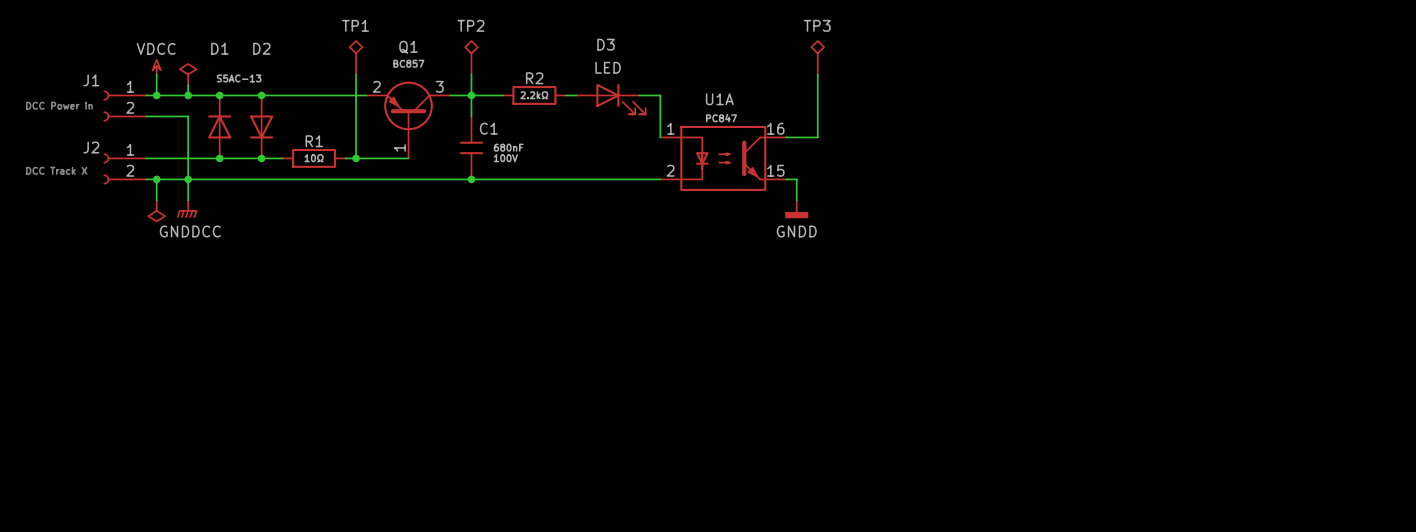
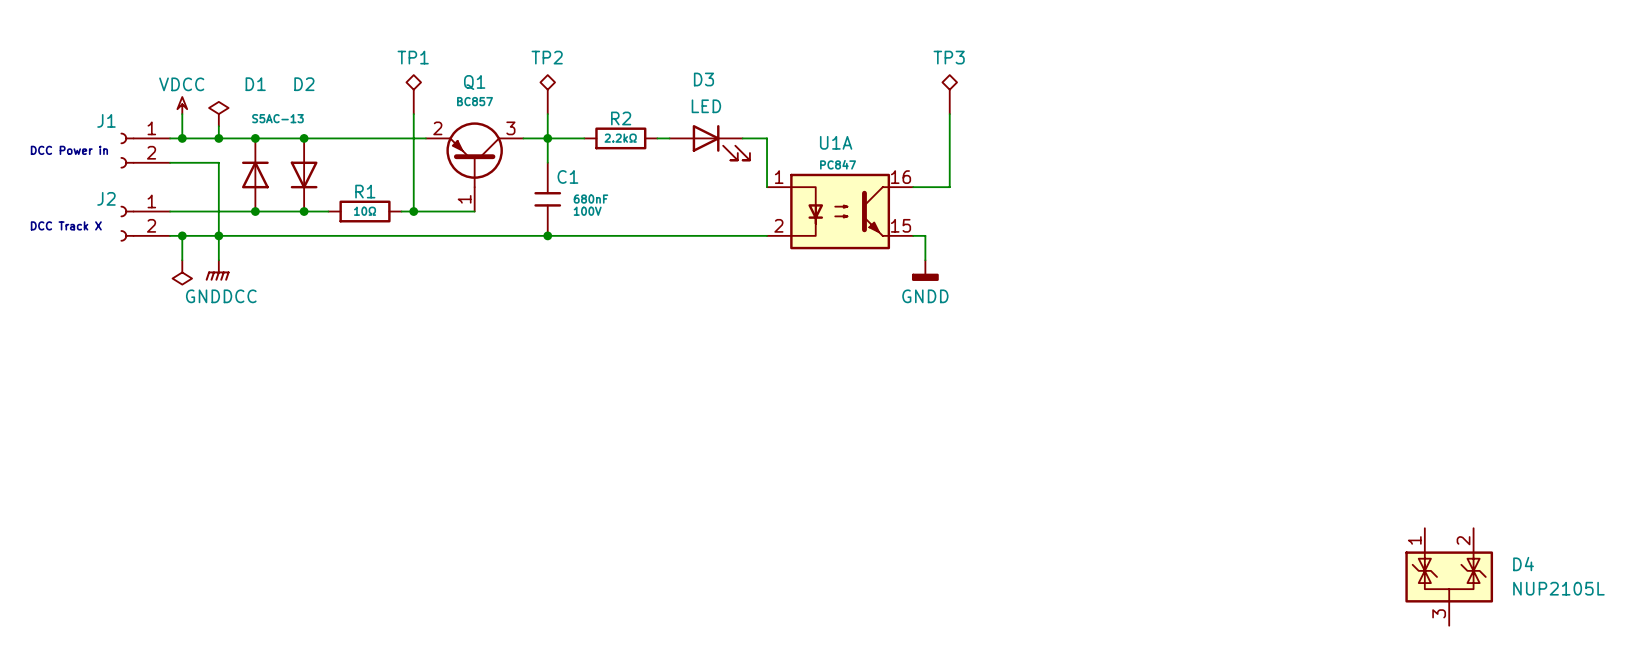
D4: none -> NUP2105L (1449, 576)

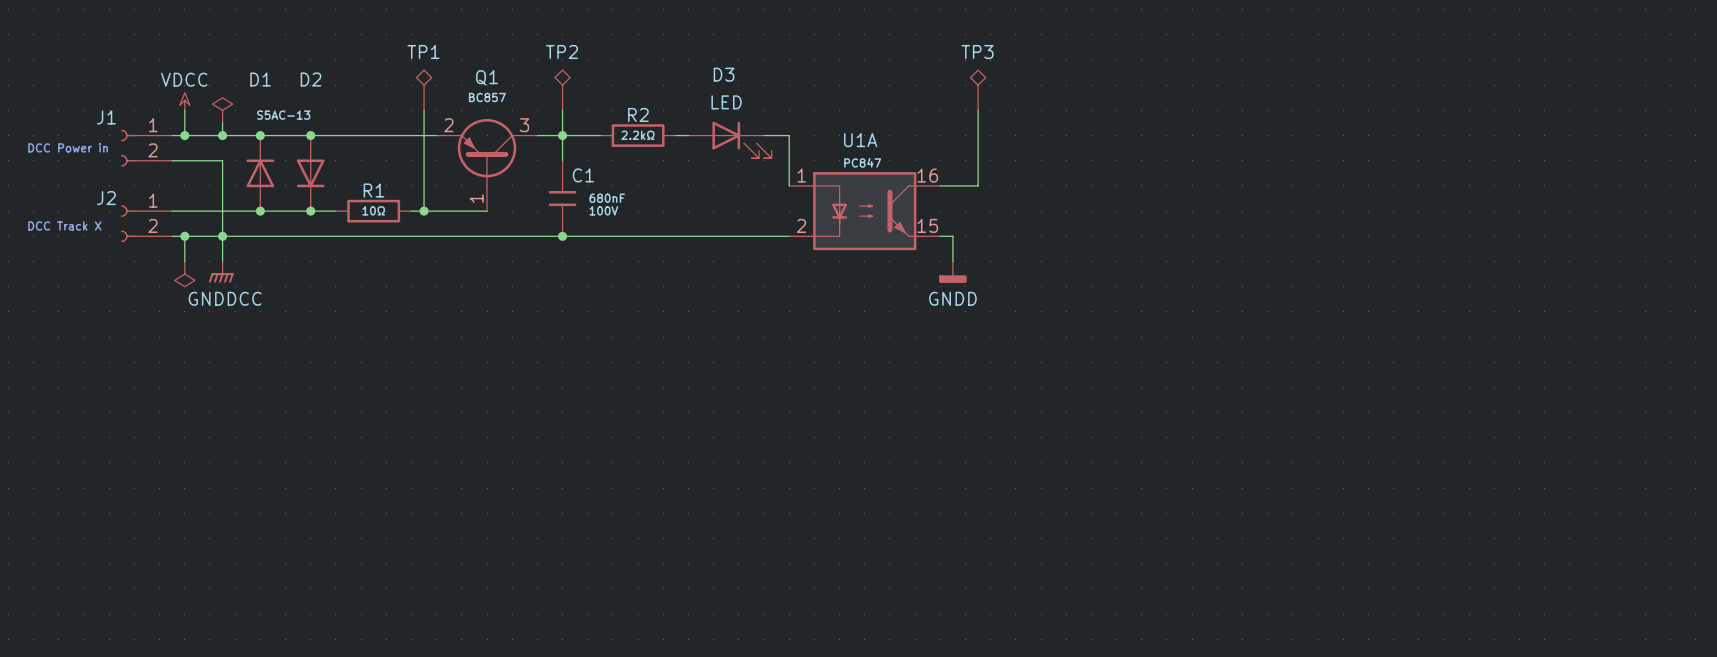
D4: NUP2105L (1449, 576) -> none

